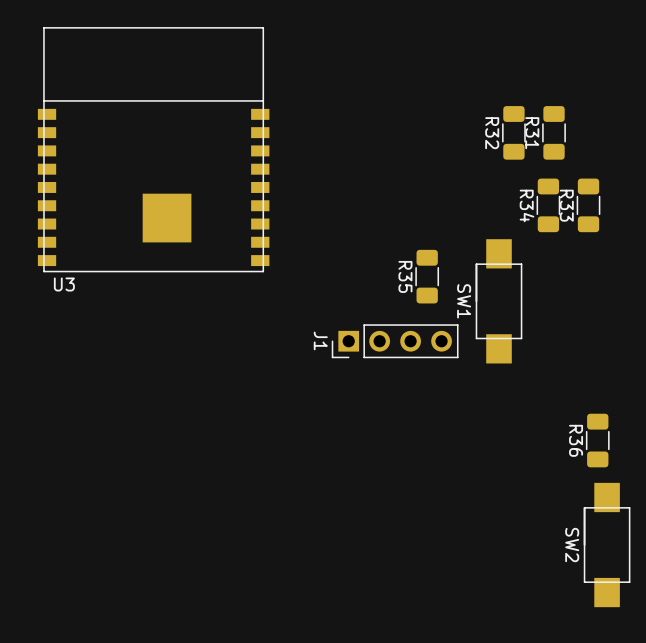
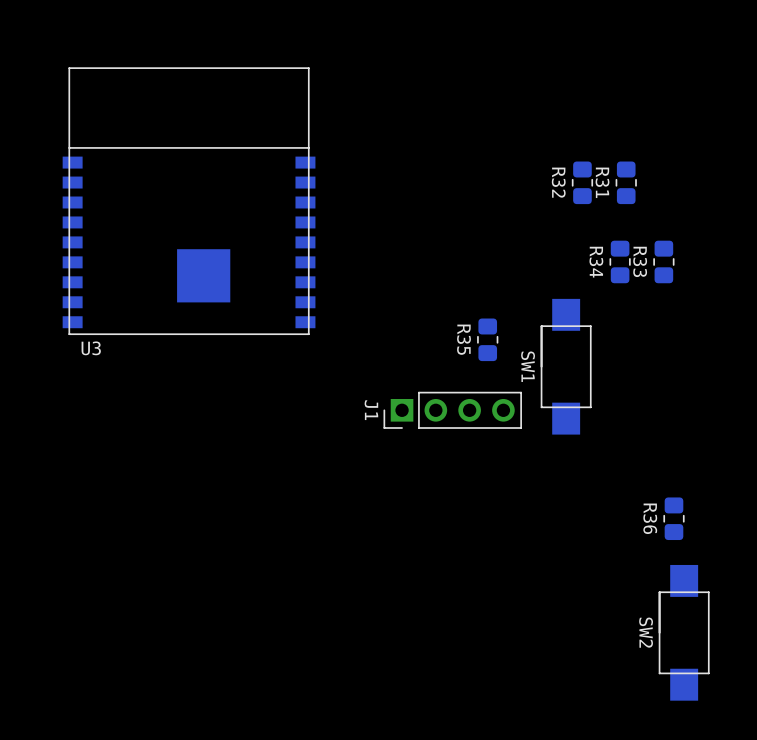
R32 footprint: [502, 106, 526, 160] -> [571, 161, 594, 205]
R31 footprint: [542, 106, 566, 160] -> [615, 161, 637, 205]
R34 footprint: [536, 178, 561, 233] -> [609, 240, 631, 284]
R33 footprint: [576, 178, 601, 233] -> [653, 240, 675, 284]
R35 footprint: [415, 249, 440, 304] -> [477, 318, 499, 362]
R36 footprint: [585, 413, 610, 468] -> [663, 497, 685, 541]

